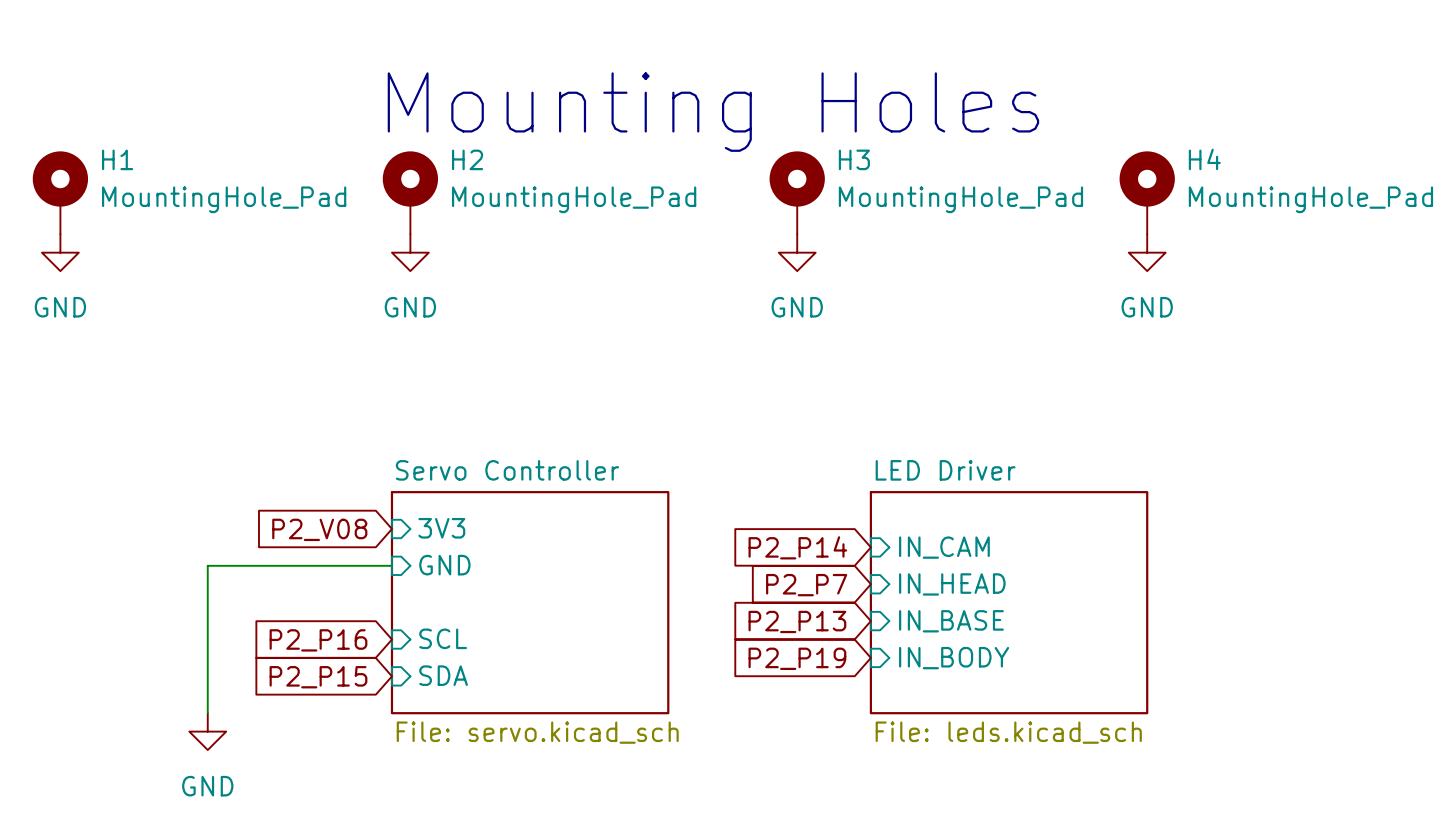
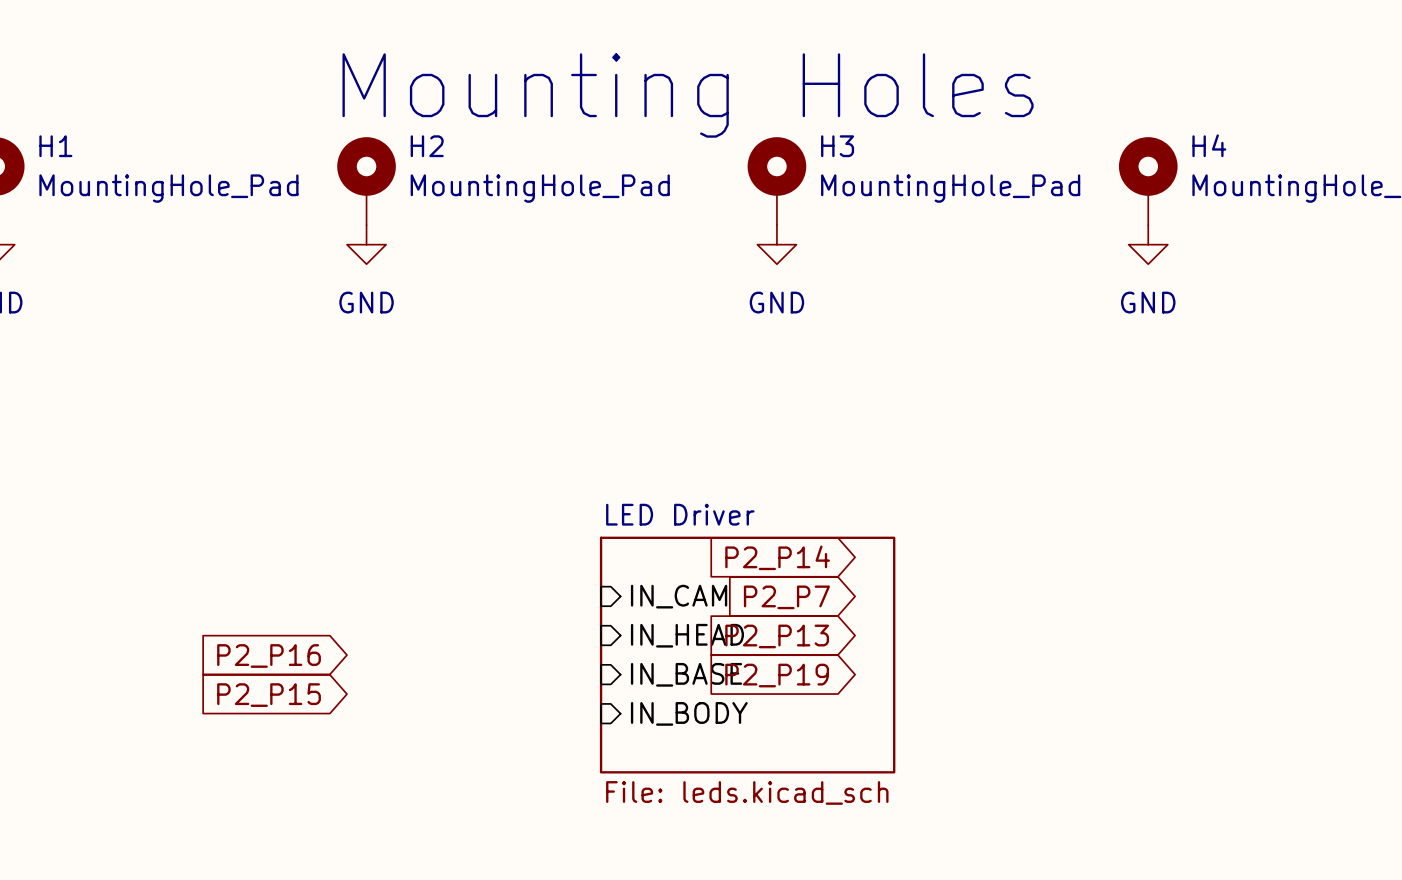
sheet pin: 3V3 (441, 528) -> none
global label: P2_V08 (319, 529) -> none
sheet pin position: IN_CAM (944, 547) -> IN_CAM (679, 596)
wire: (391, 565) (207, 565) (207, 713) -> none
sheet pin: GND (444, 565) -> none
sheet pin position: IN_HEAD (952, 584) -> IN_HEAD (687, 635)
sheet Servo Controller: File: servo.kicad_sch (530, 602) -> none
sheet LED Driver position: (1009, 602) -> (747, 655)
sheet pin position: IN_BASE (951, 621) -> IN_BASE (686, 674)
sheet pin: SCL (443, 638) -> none
sheet pin position: IN_BODY (954, 658) -> IN_BODY (689, 713)
sheet pin: SDA (443, 675) -> none
power symbol: GND (207, 731) -> none

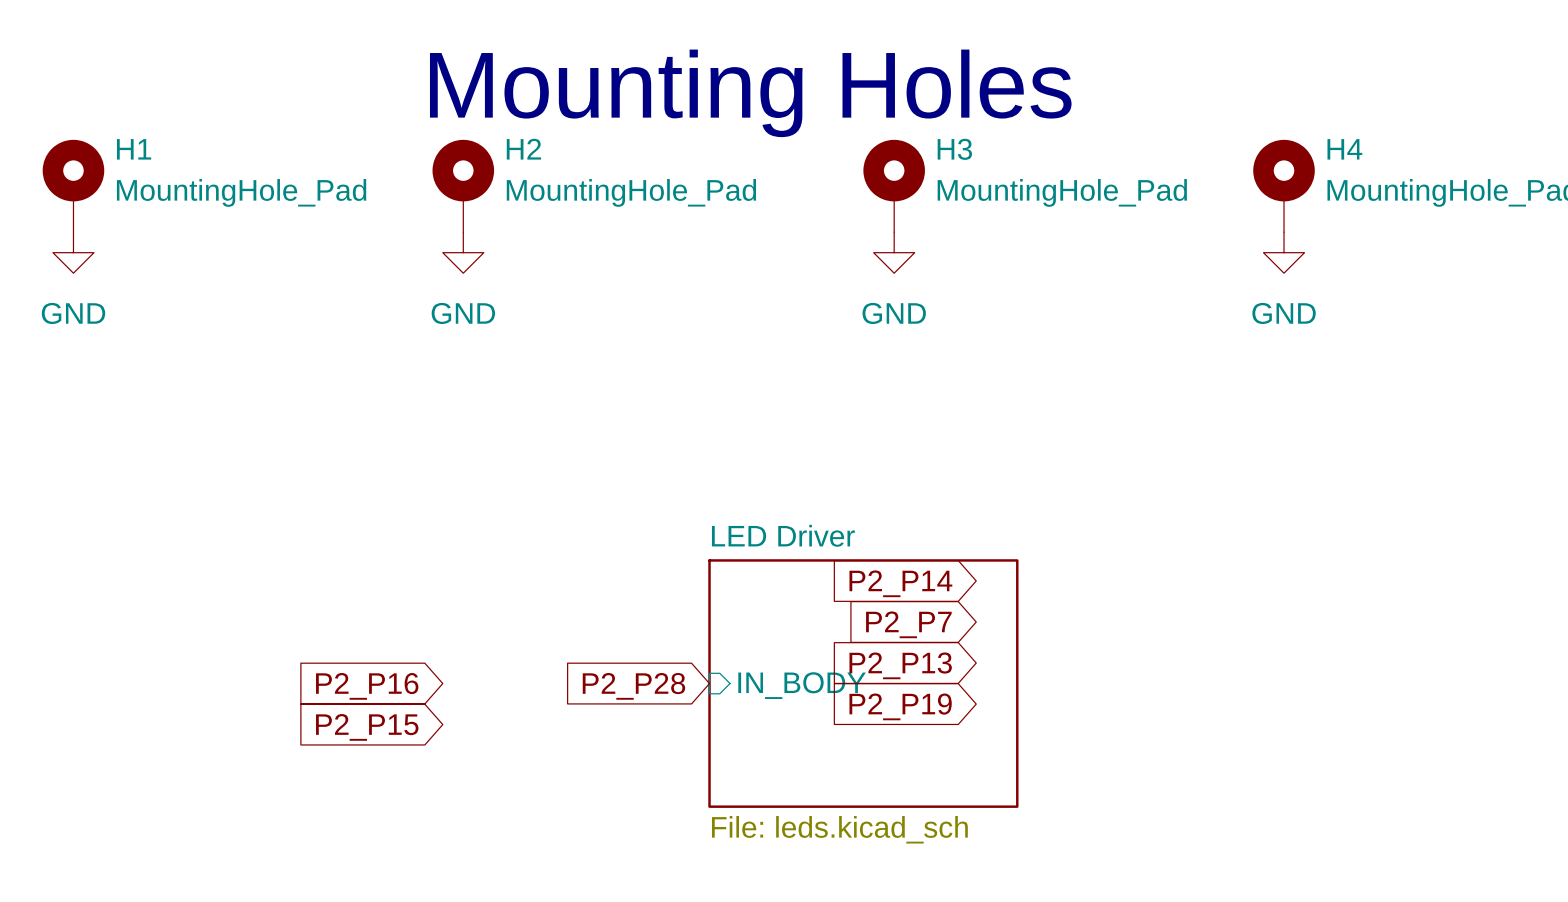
sheet pin: IN_CAM (679, 596) -> none
sheet pin: IN_HEAD (687, 635) -> none
global label: none -> P2_P28 (633, 686)
sheet pin: IN_BASE (686, 674) -> none
sheet pin position: IN_BODY (689, 713) -> IN_BODY (802, 685)

